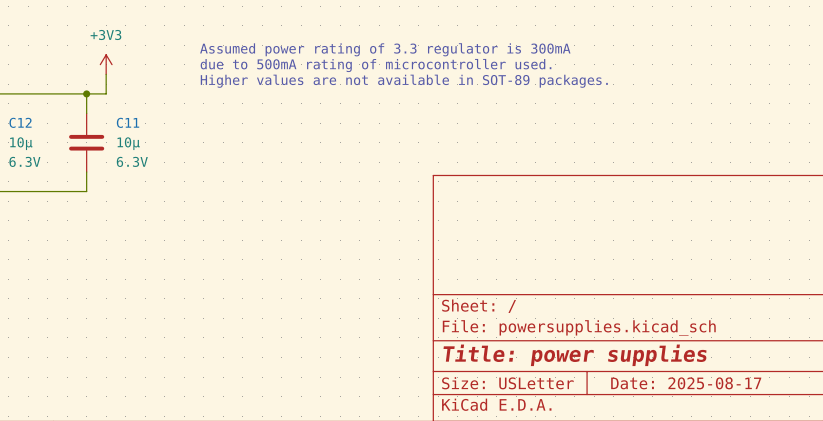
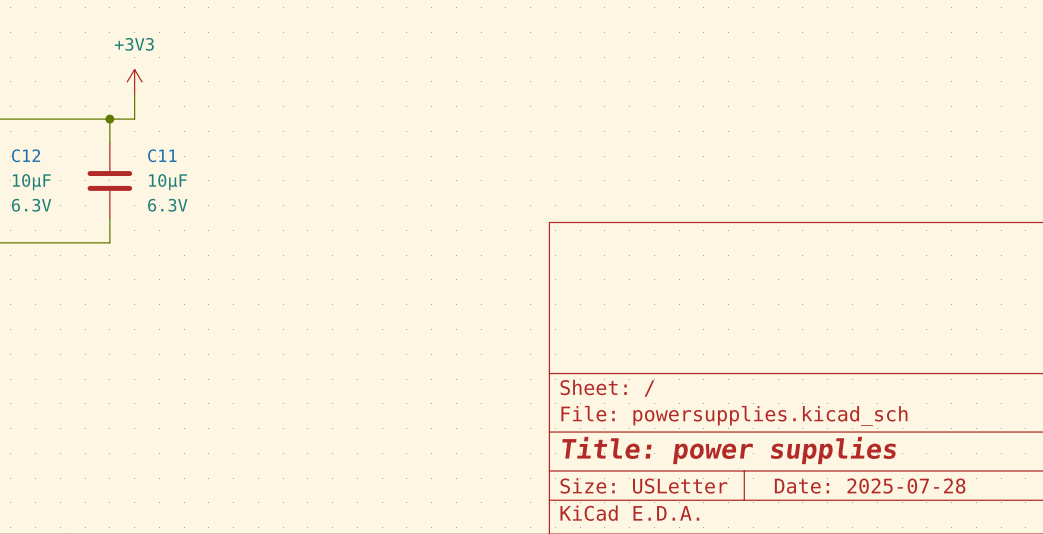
text: Assumed power rating of 3.3 regulator is 300mA (385, 49) -> none
text: due to 500mA rating of microcontroller used. (376, 65) -> none
text: Higher values are not available in SOT-89 packages. (404, 81) -> none
C12 value: 10µ (21, 143) -> 10µF (31, 182)
C11 value: 10µ (128, 143) -> 10µF (167, 182)
title block: Date: 2025-08-17 (686, 383) -> Date: 2025-07-28 (870, 486)

